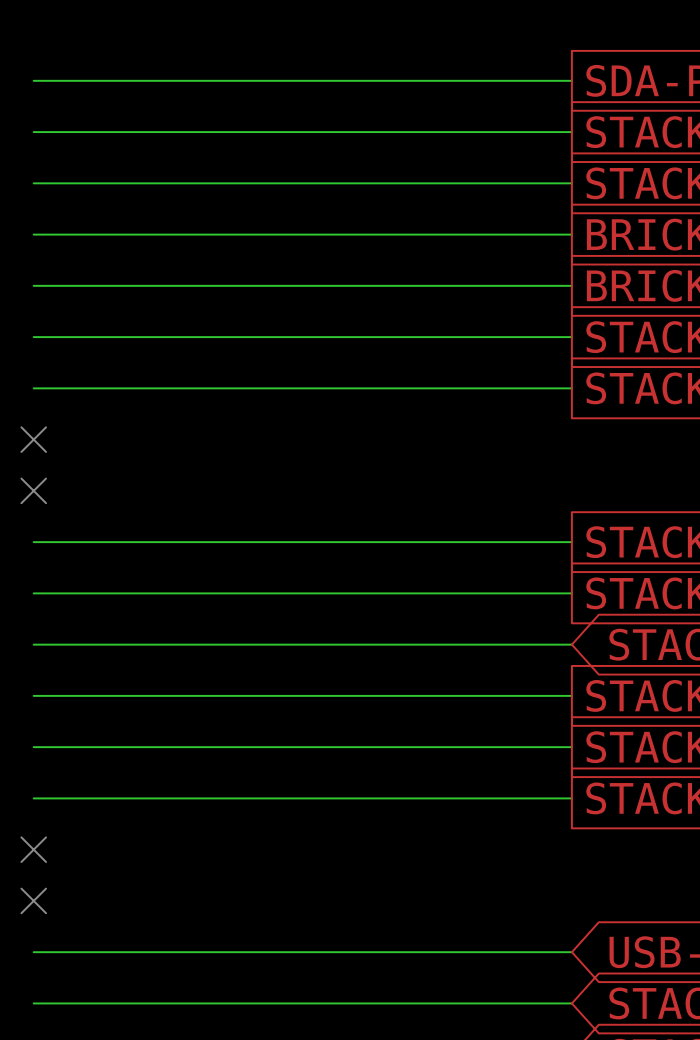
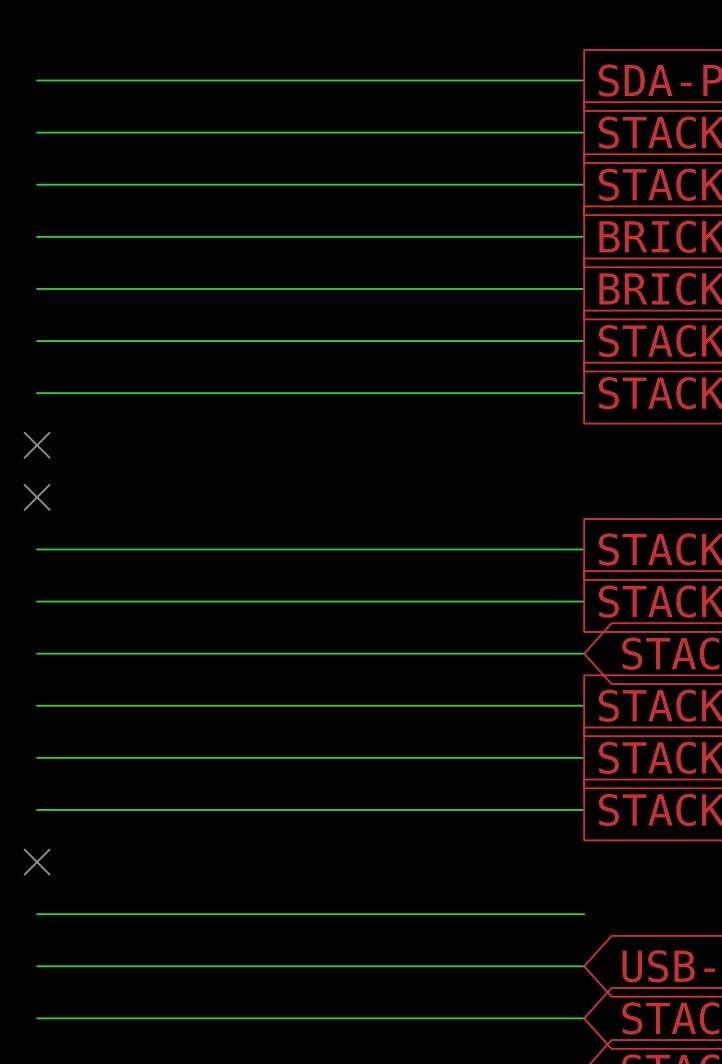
wire: none -> (37, 914) (584, 914)
no-connect mark: (33, 900) -> none

